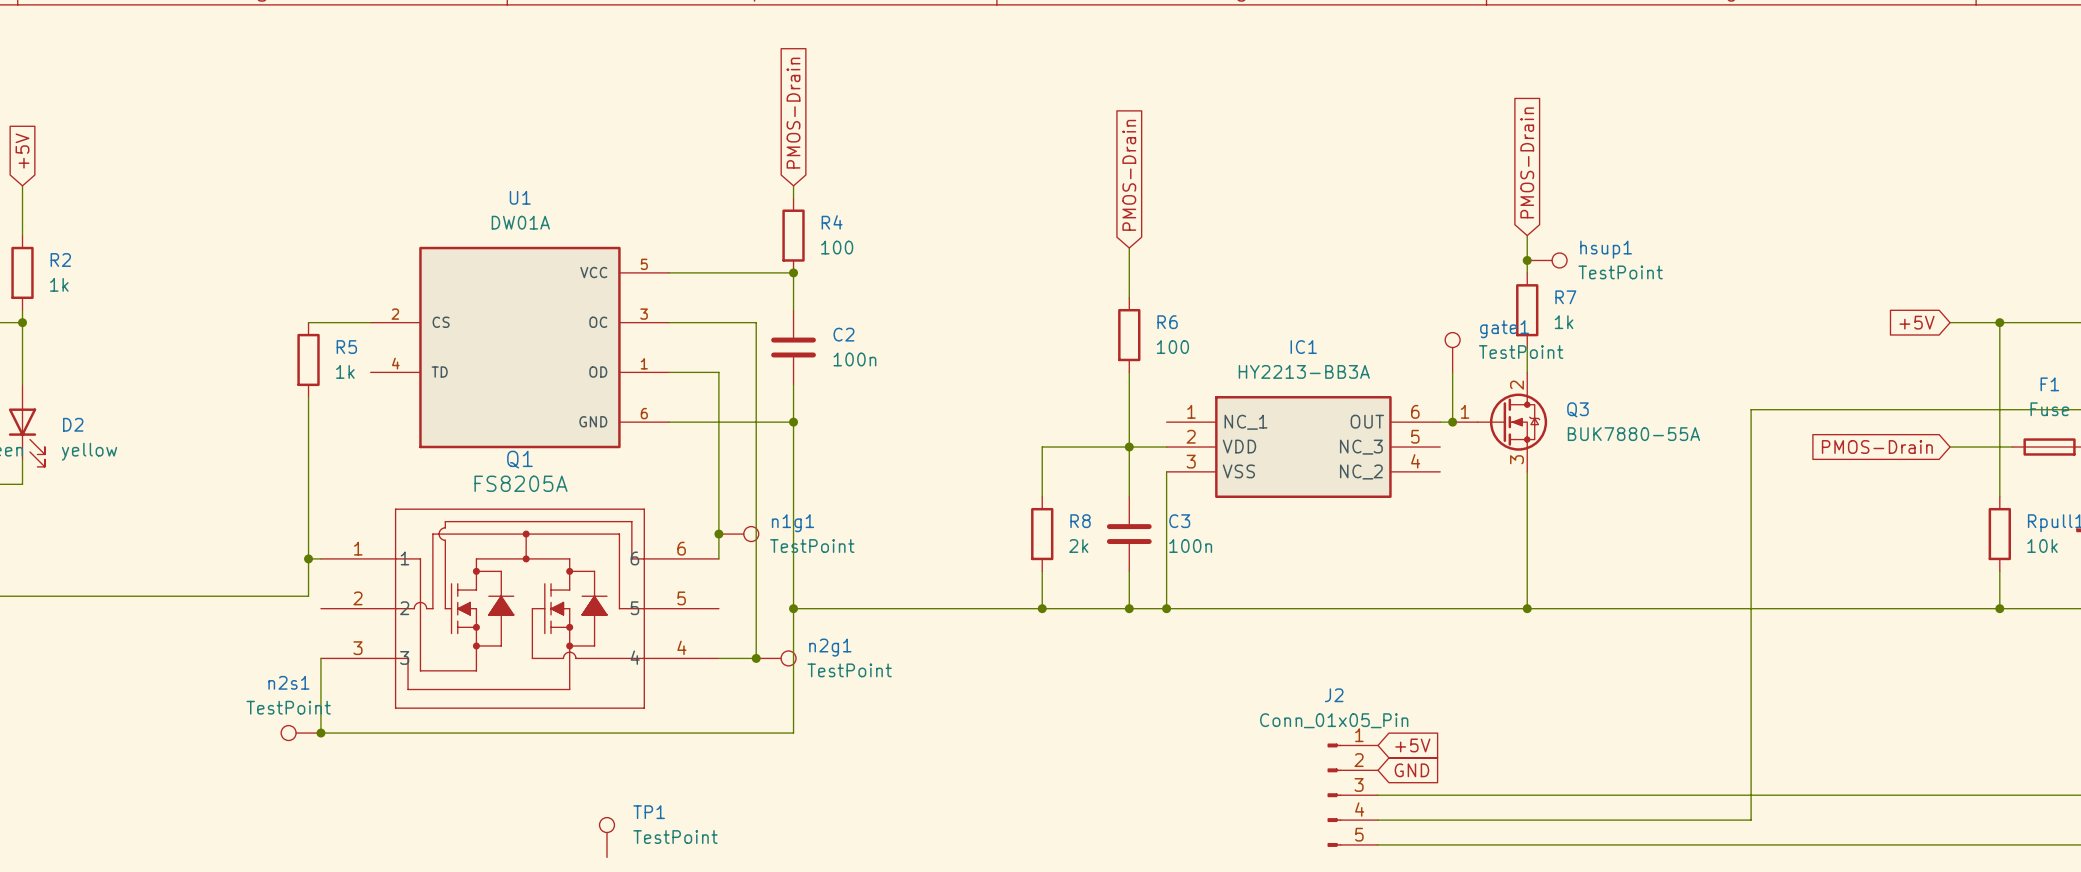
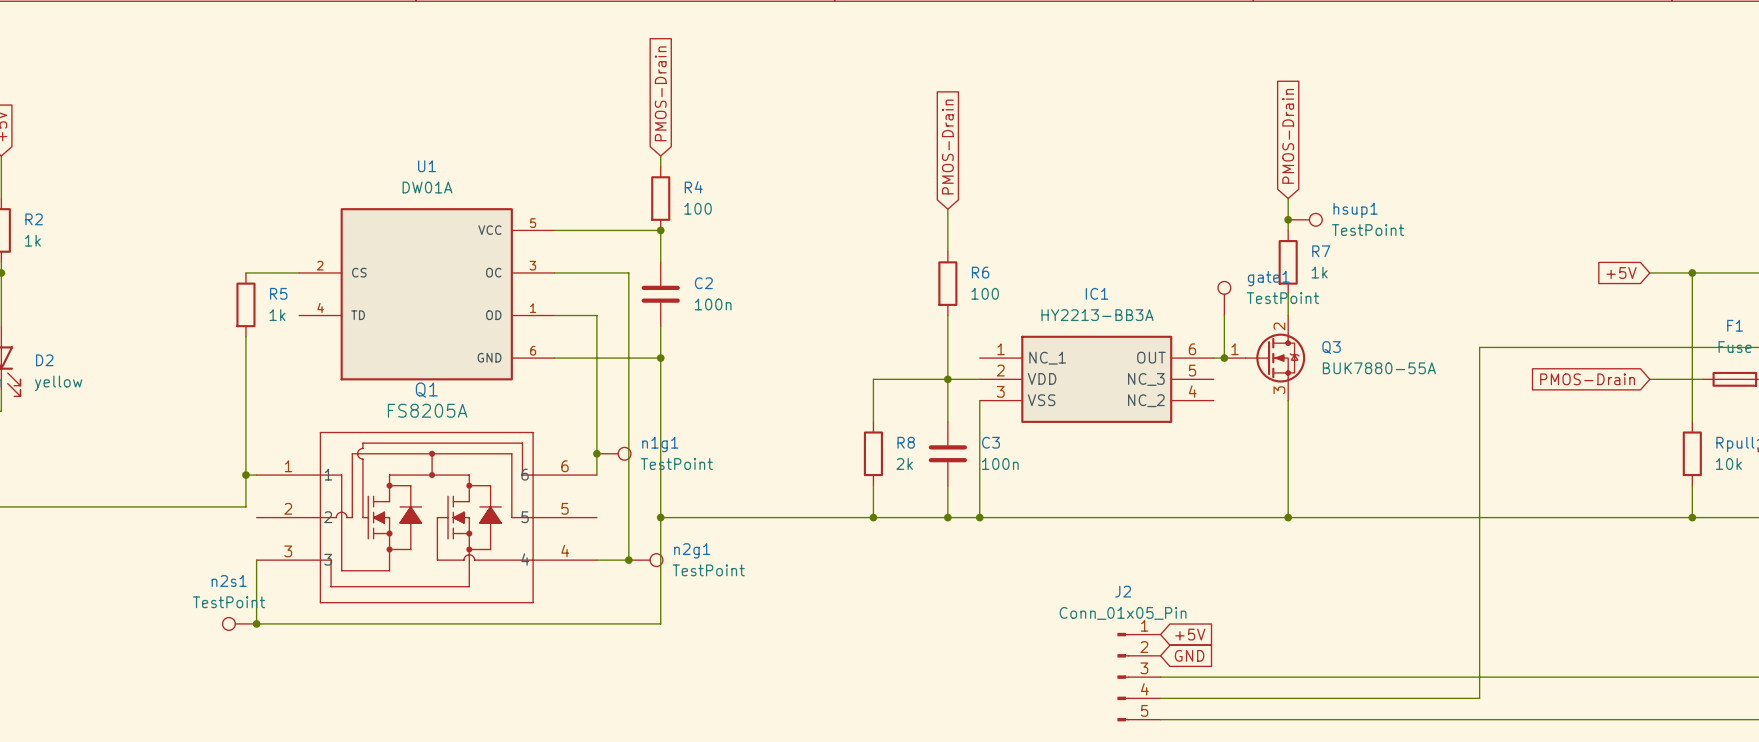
TP1: TestPoint (606, 837) -> none

